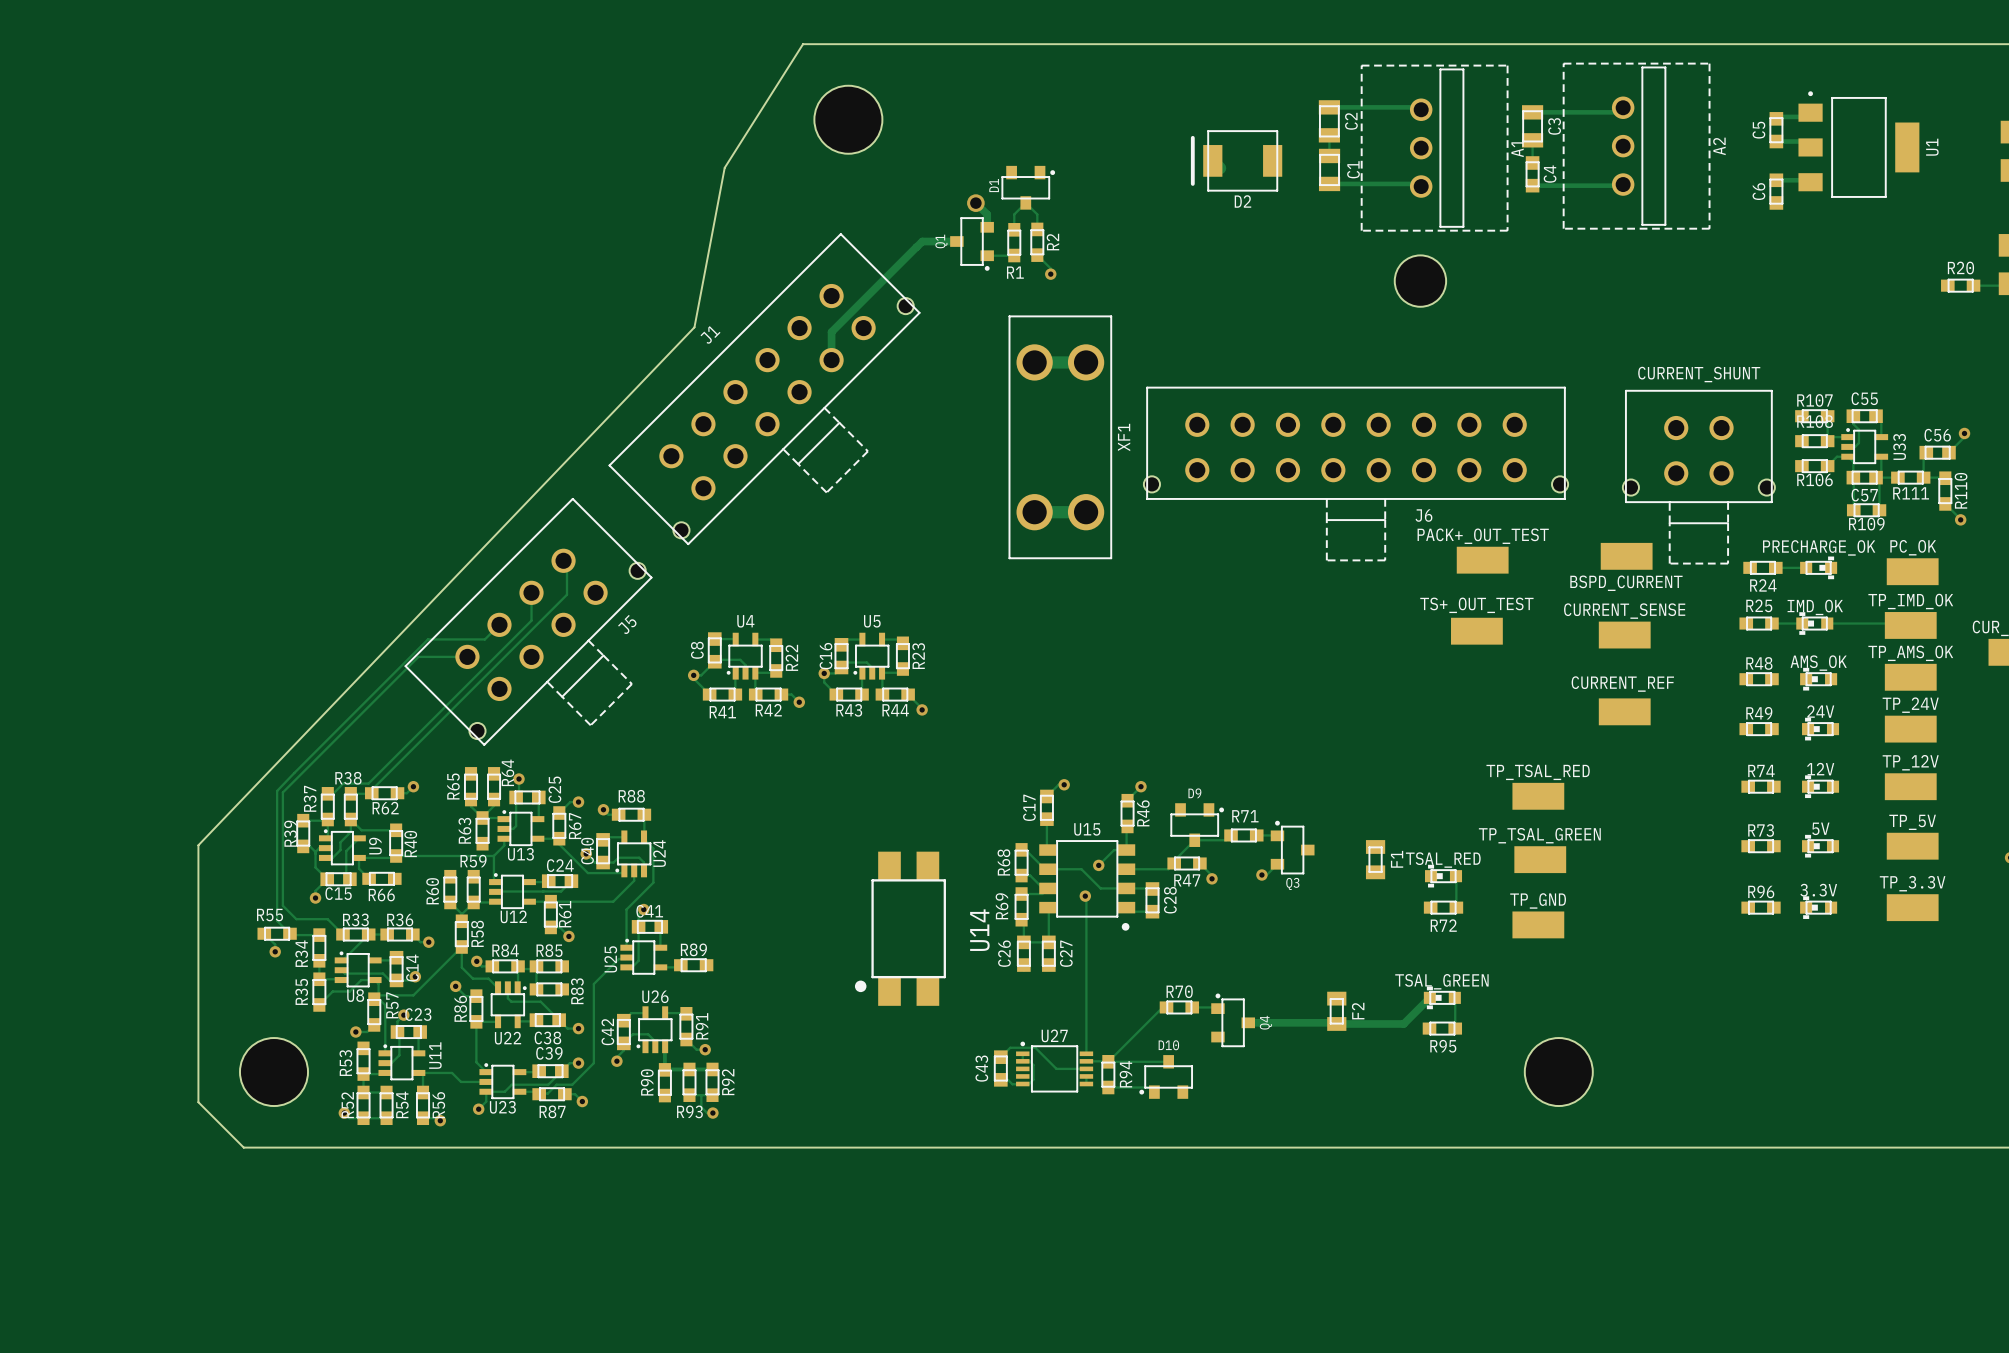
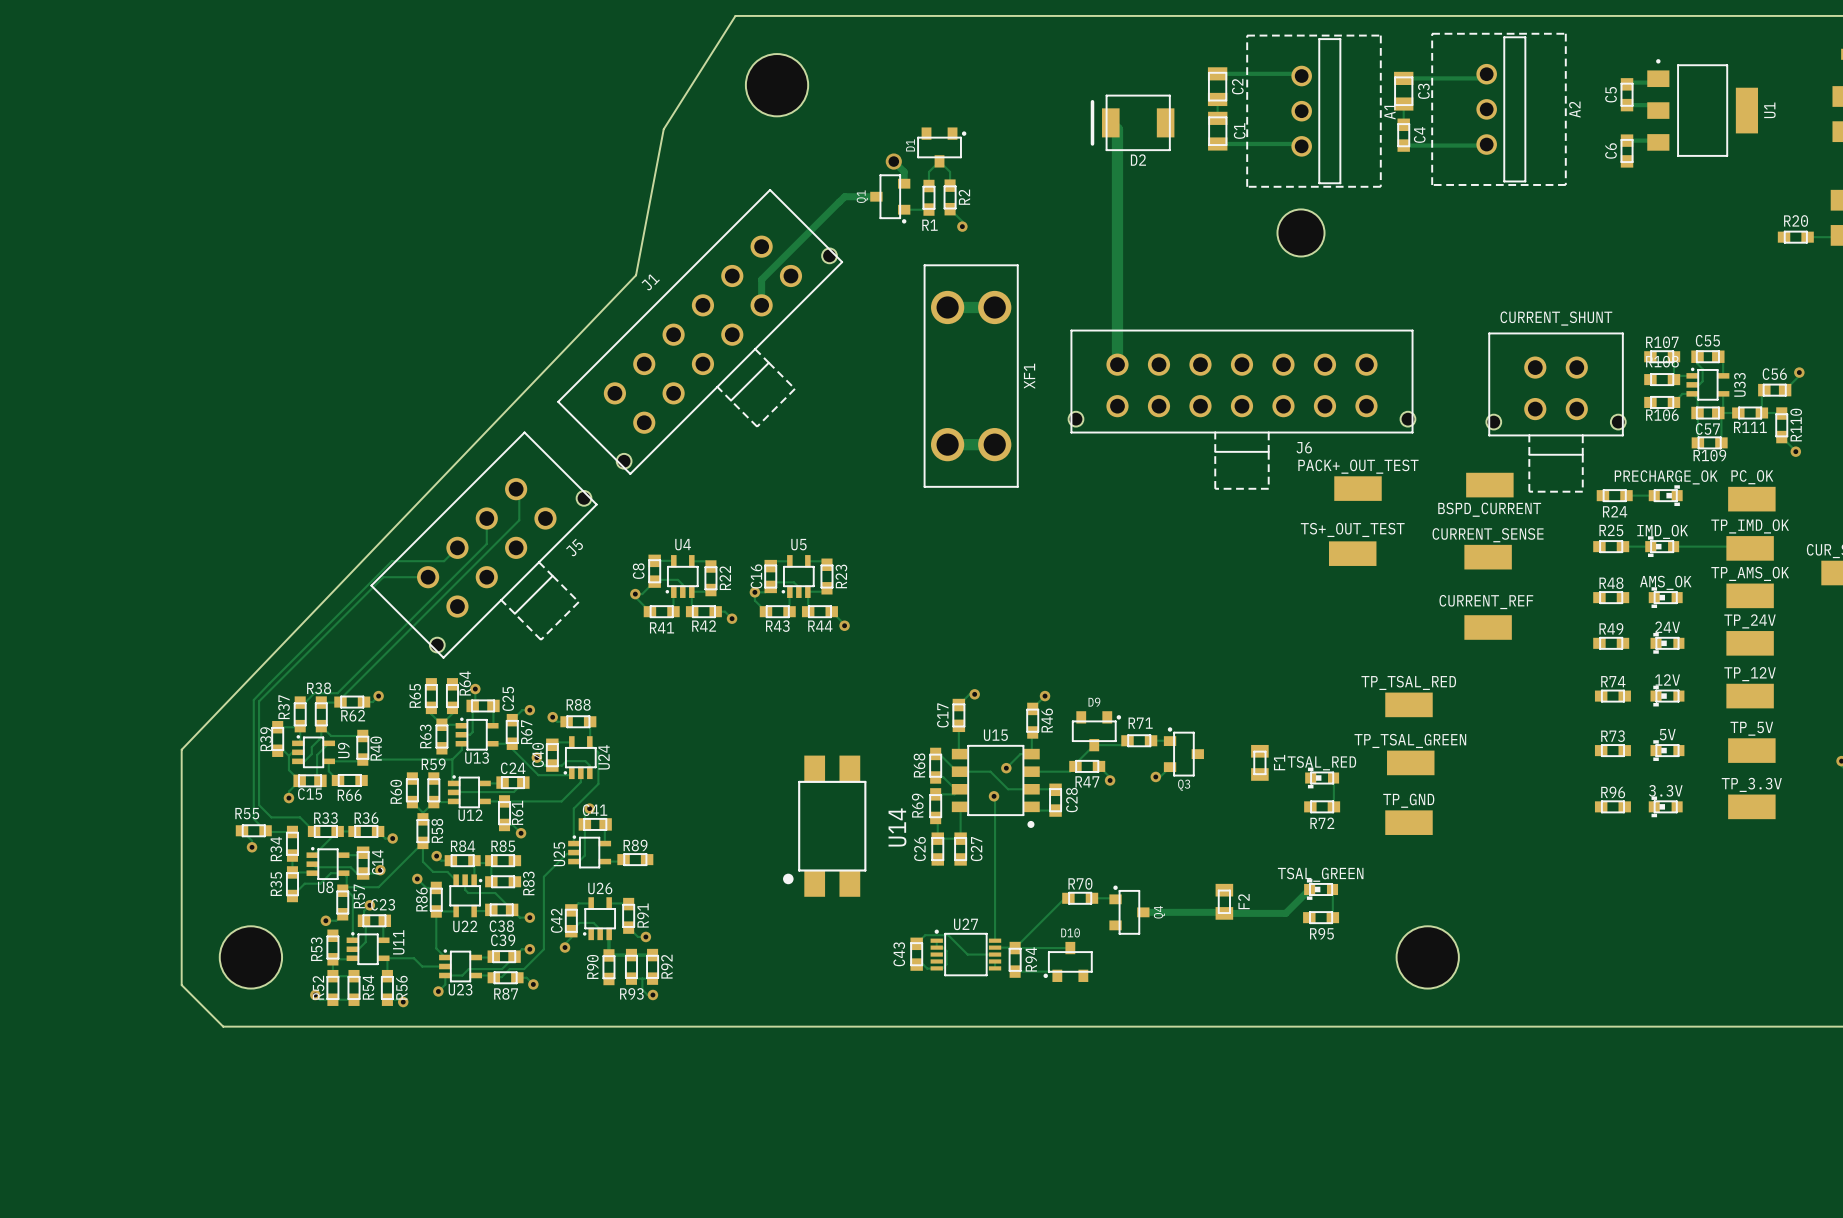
track: none -> (1117, 129) (1117, 364)
J6 footprint: [1143, 386, 1569, 562] -> [1068, 329, 1416, 490]

